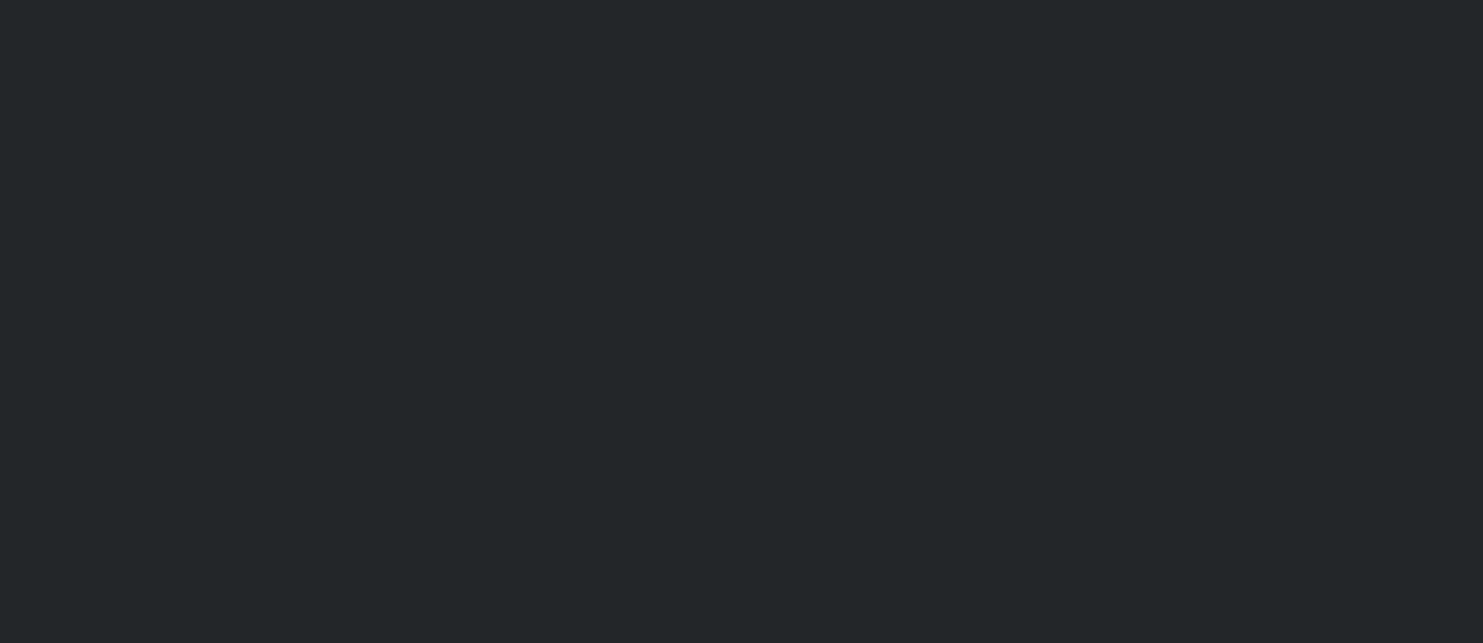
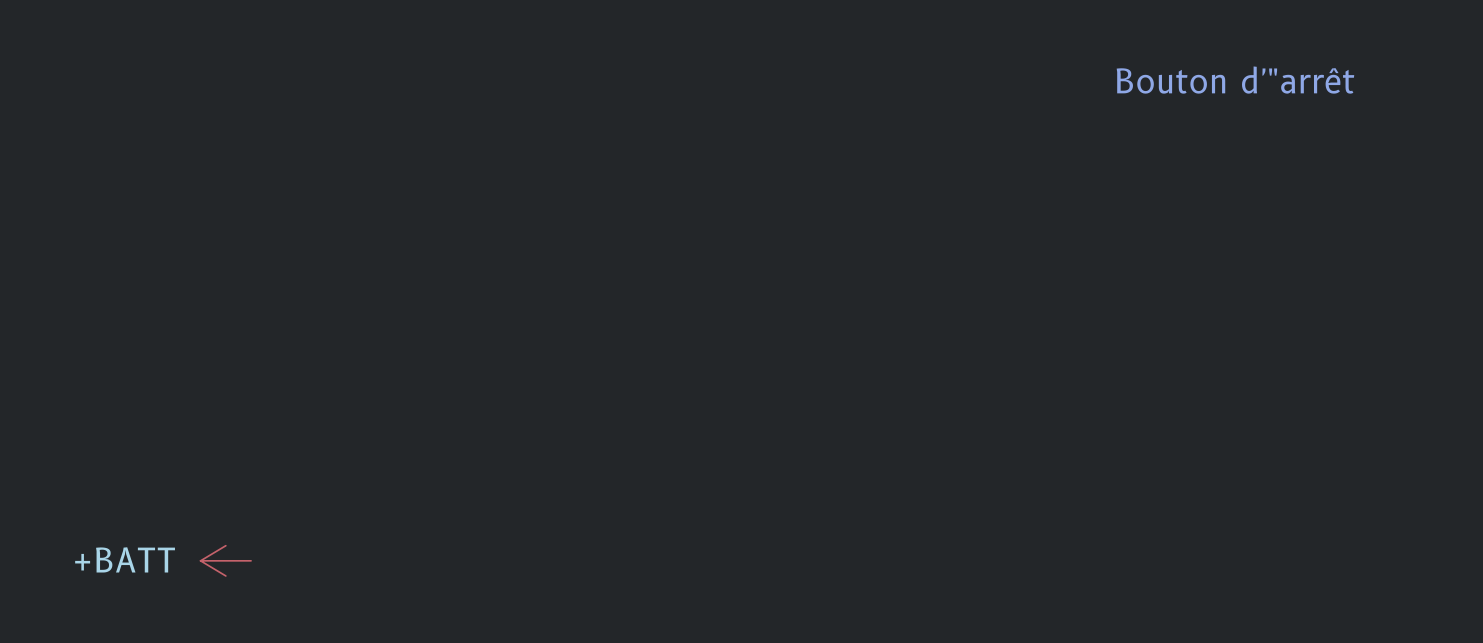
text: none -> Bouton d'"arrêt (1235, 80)
power symbol: none -> +BATT (225, 560)

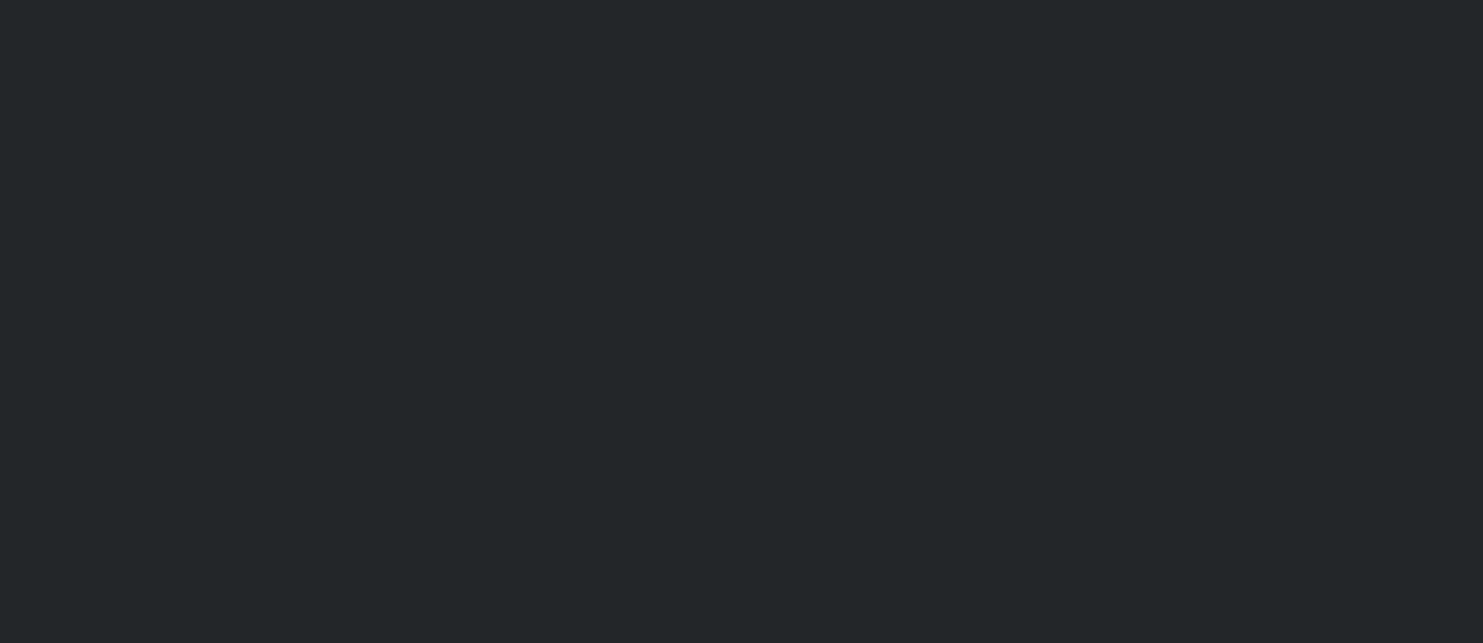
text: Bouton d'"arrêt (1235, 80) -> none
power symbol: +BATT (225, 560) -> none

